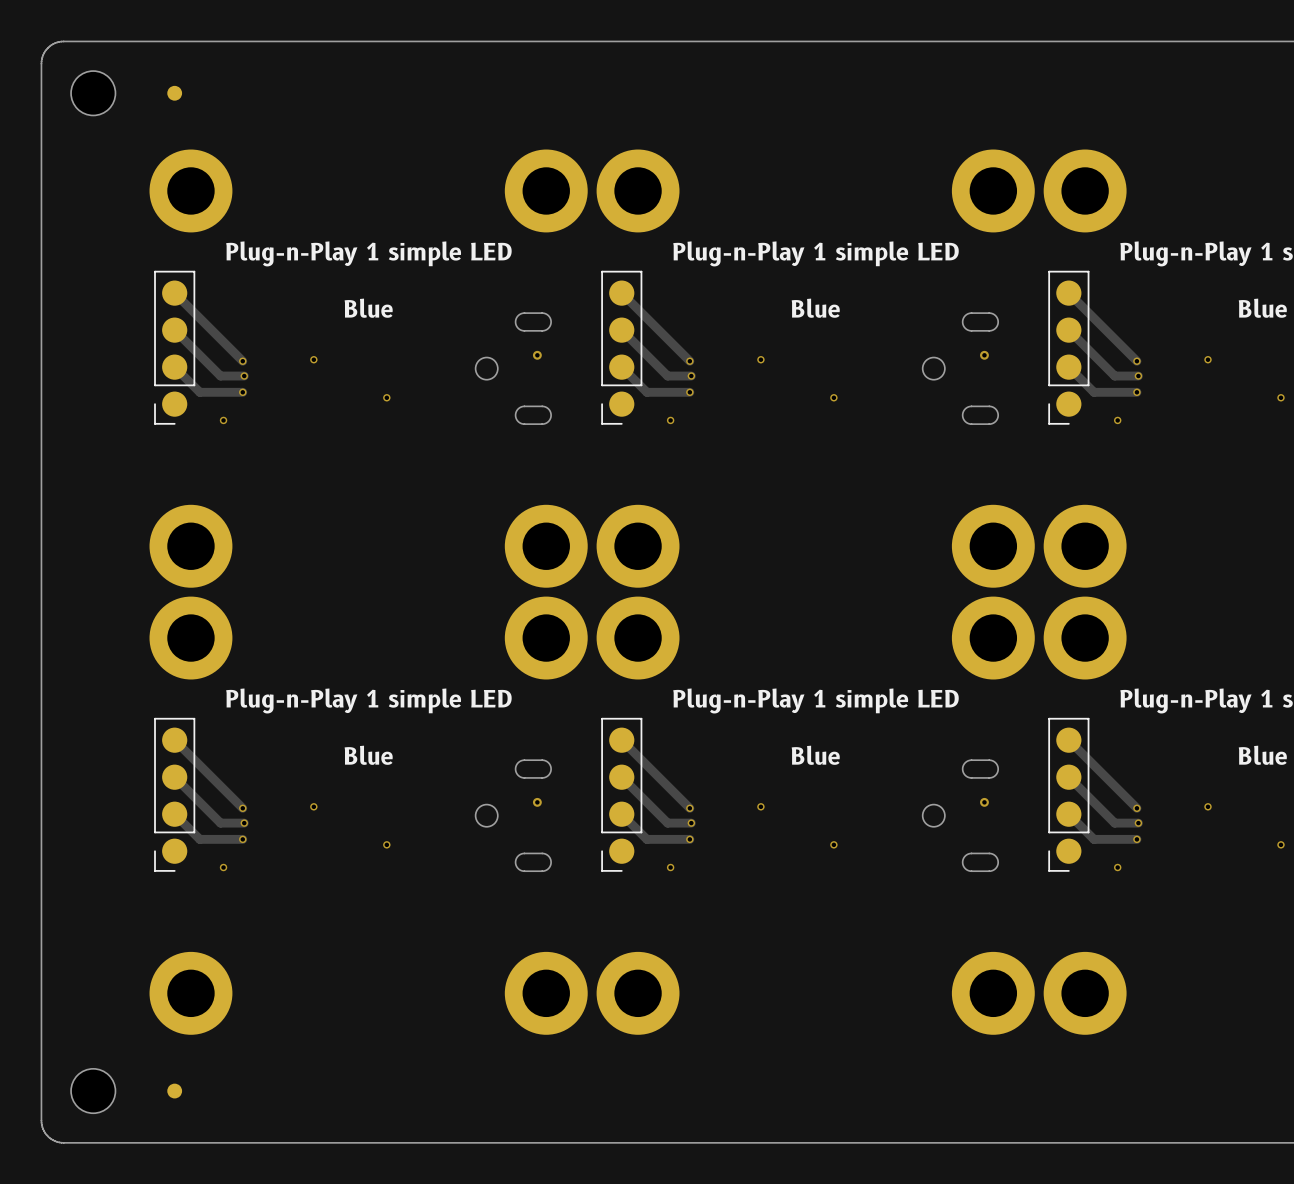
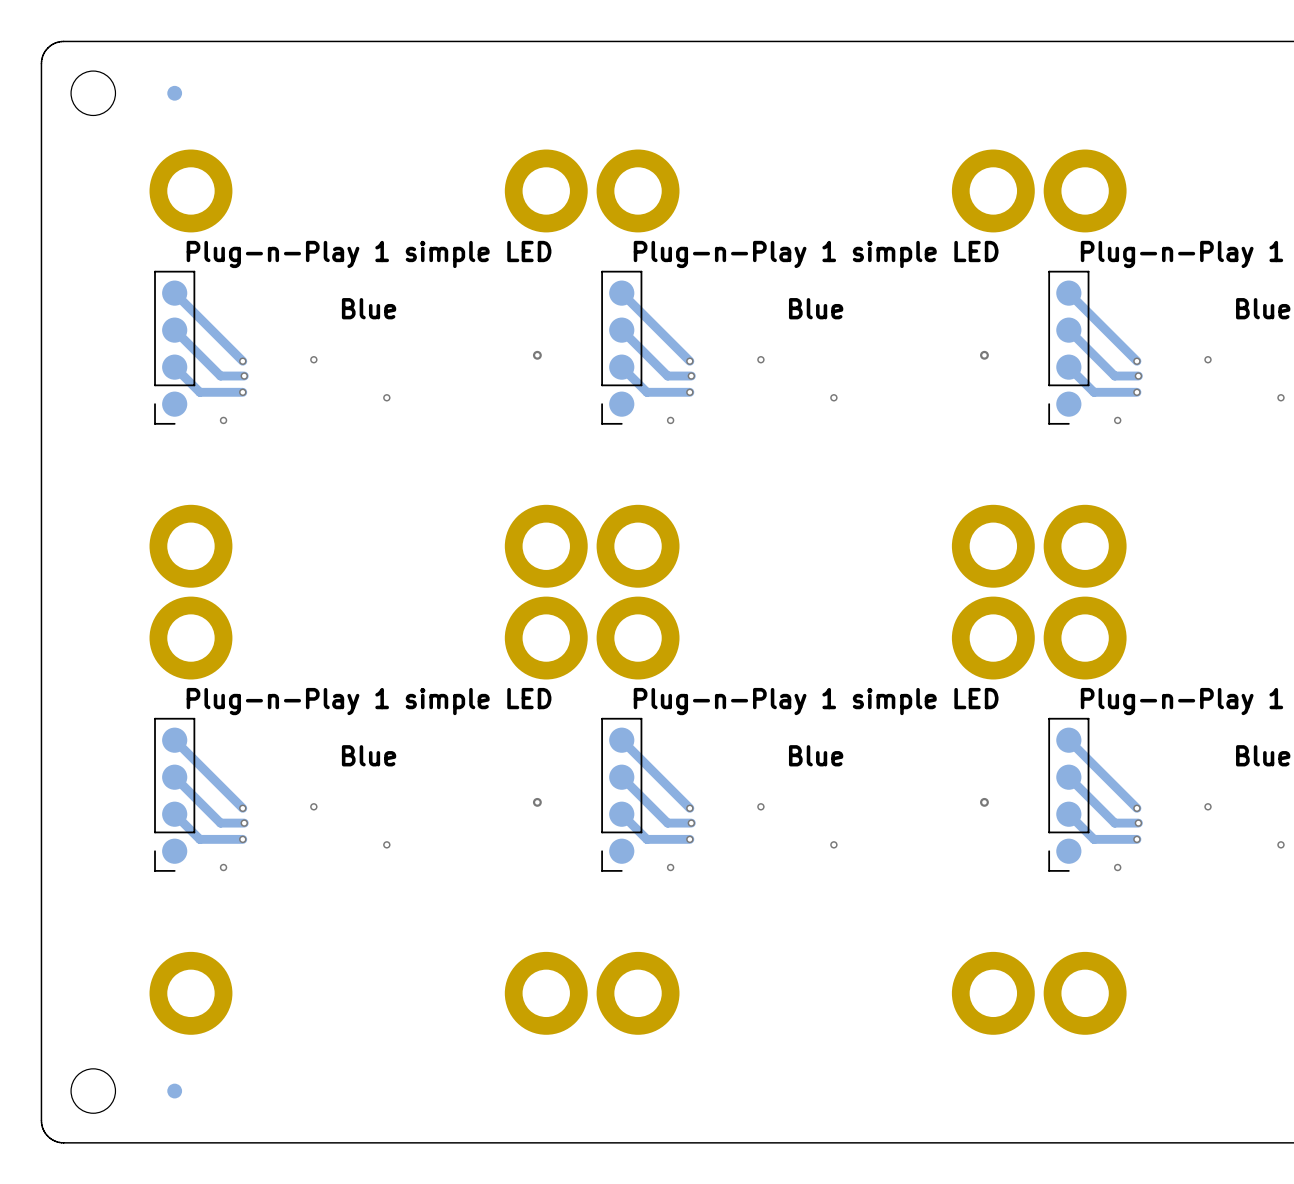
drawing: [475, 312, 552, 425] -> none
drawing: [922, 312, 999, 425] -> none
drawing: [475, 759, 552, 872] -> none
drawing: [922, 759, 999, 872] -> none

